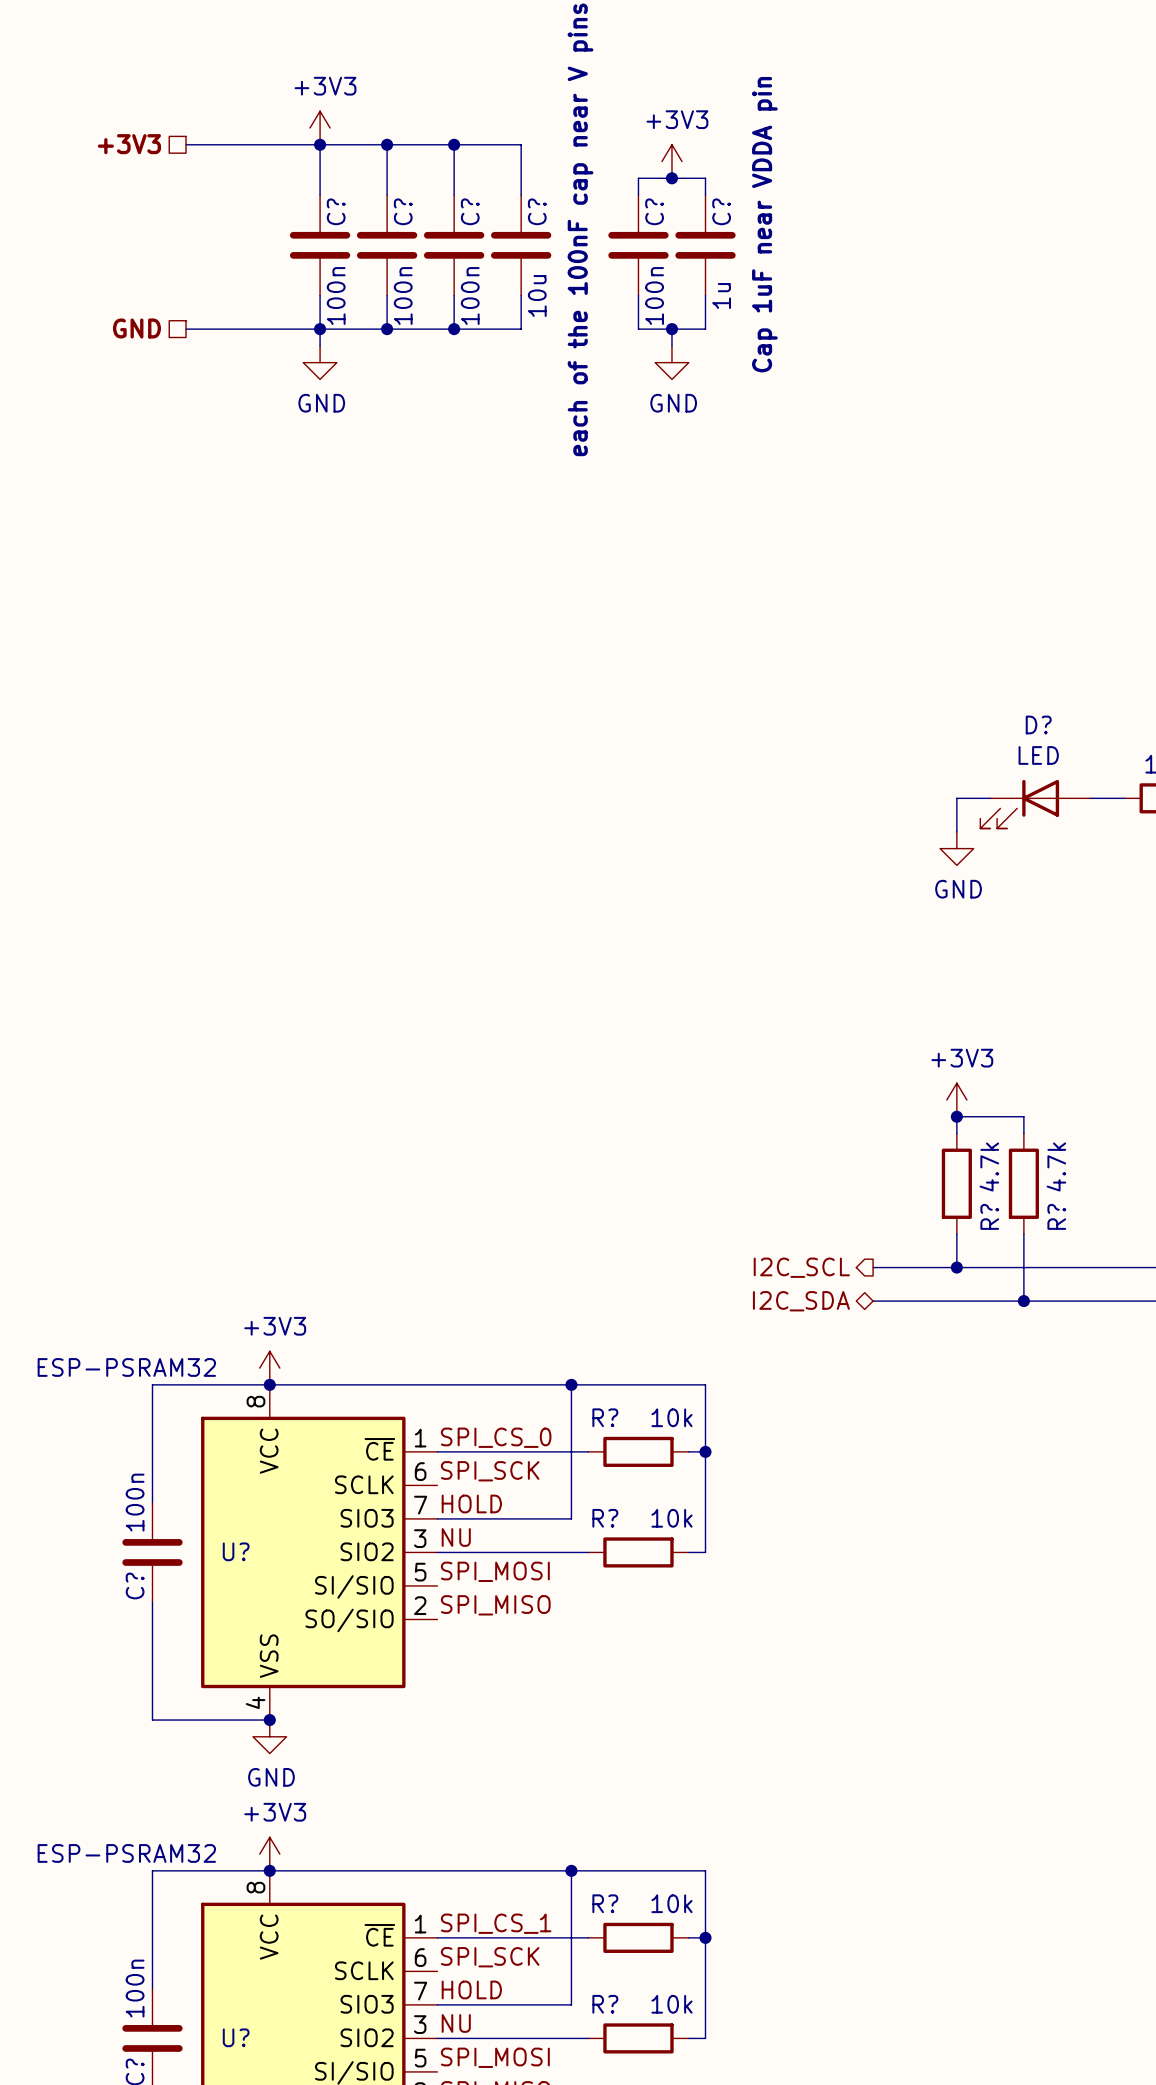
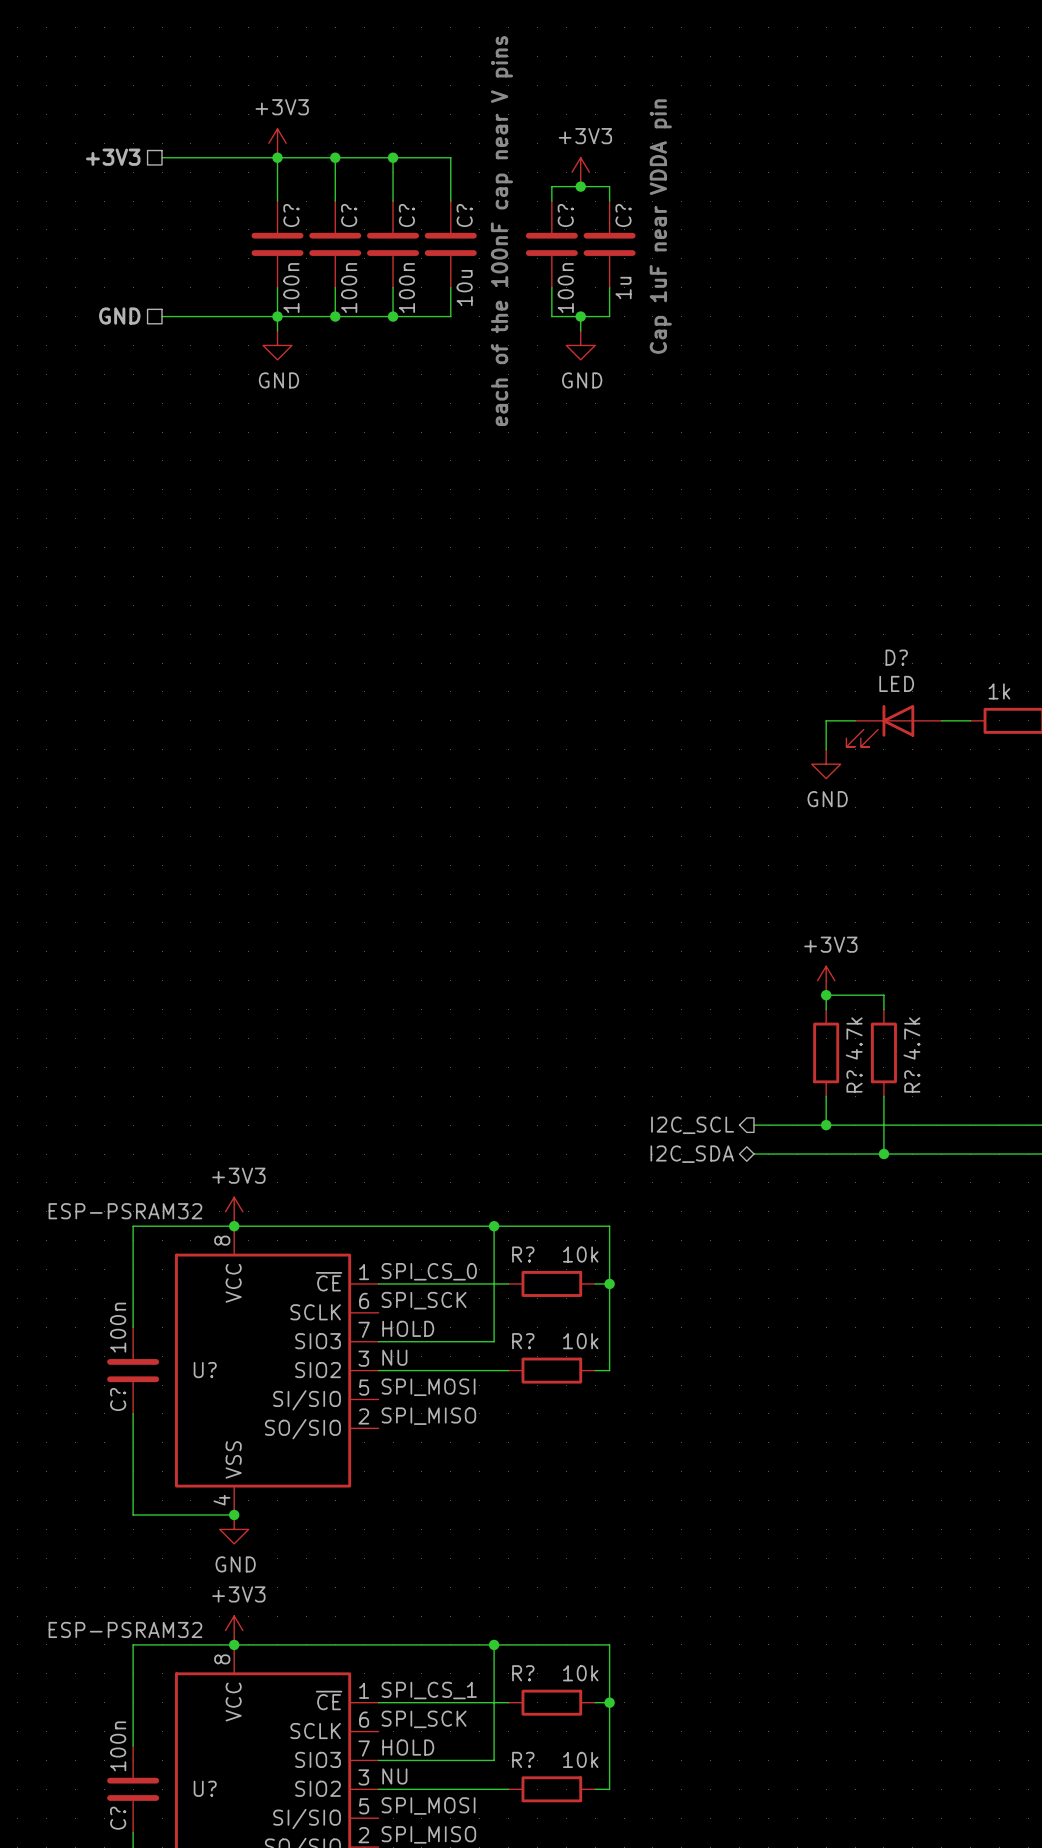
U? value position: ESP-PSRAM32 (126, 1367) -> ESP-PSRAM32 (125, 1211)
U? value position: ESP-PSRAM32 (126, 1853) -> ESP-PSRAM32 (125, 1629)

